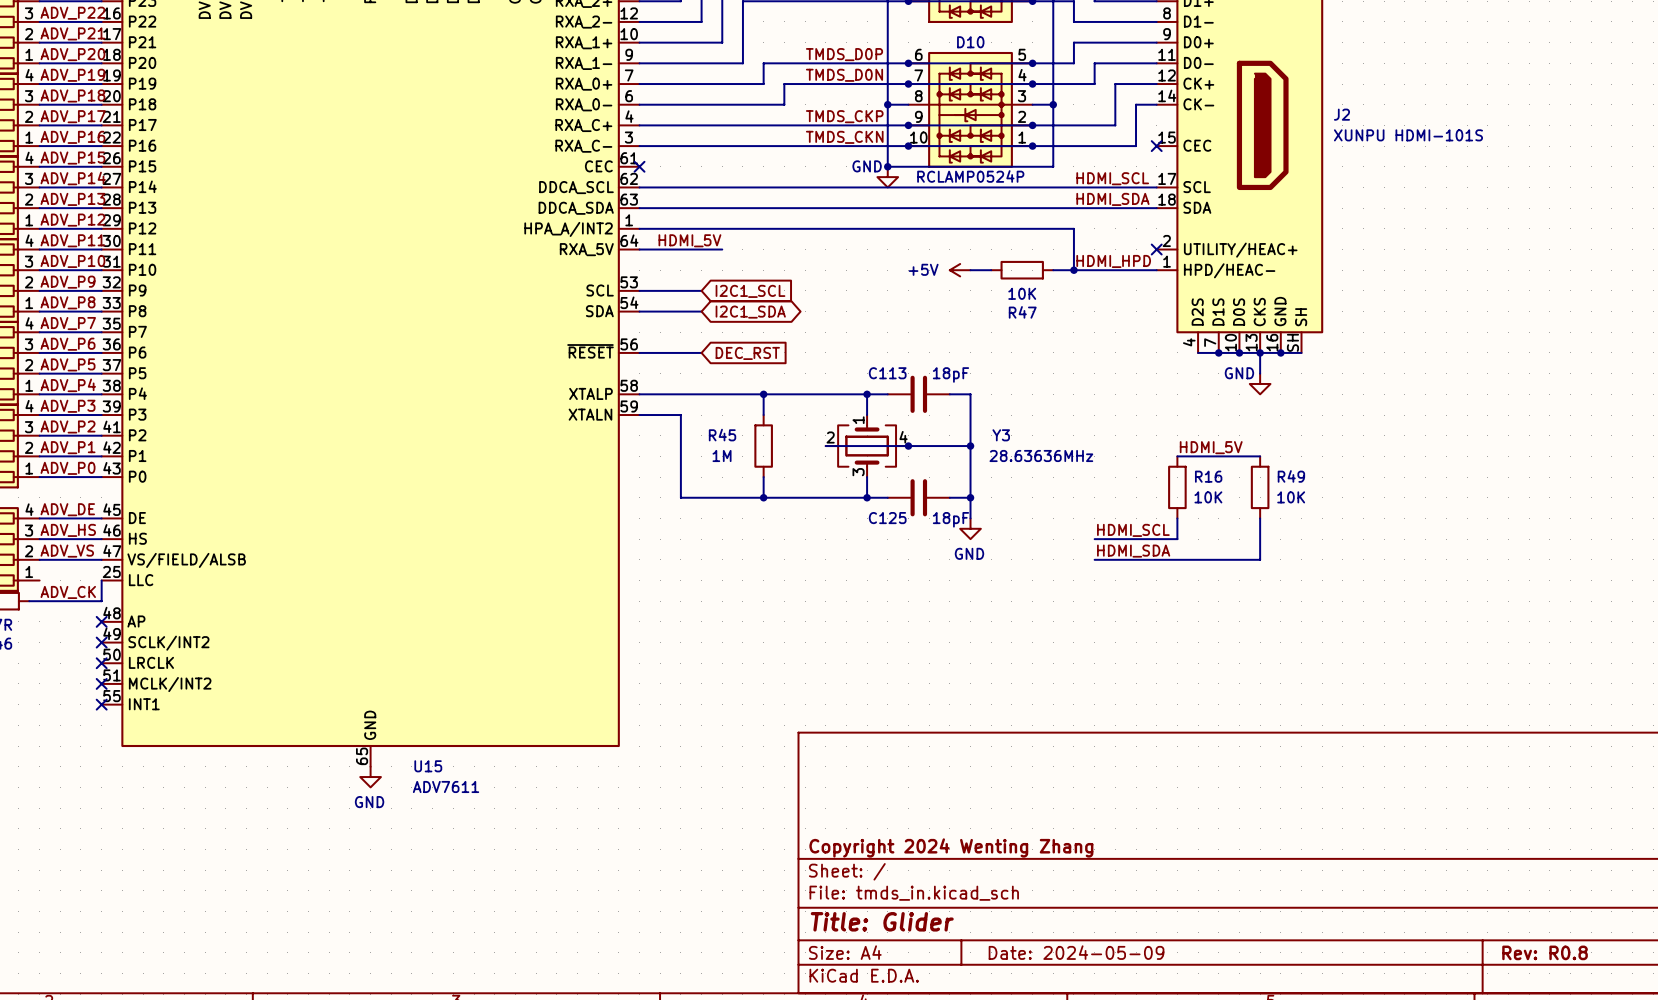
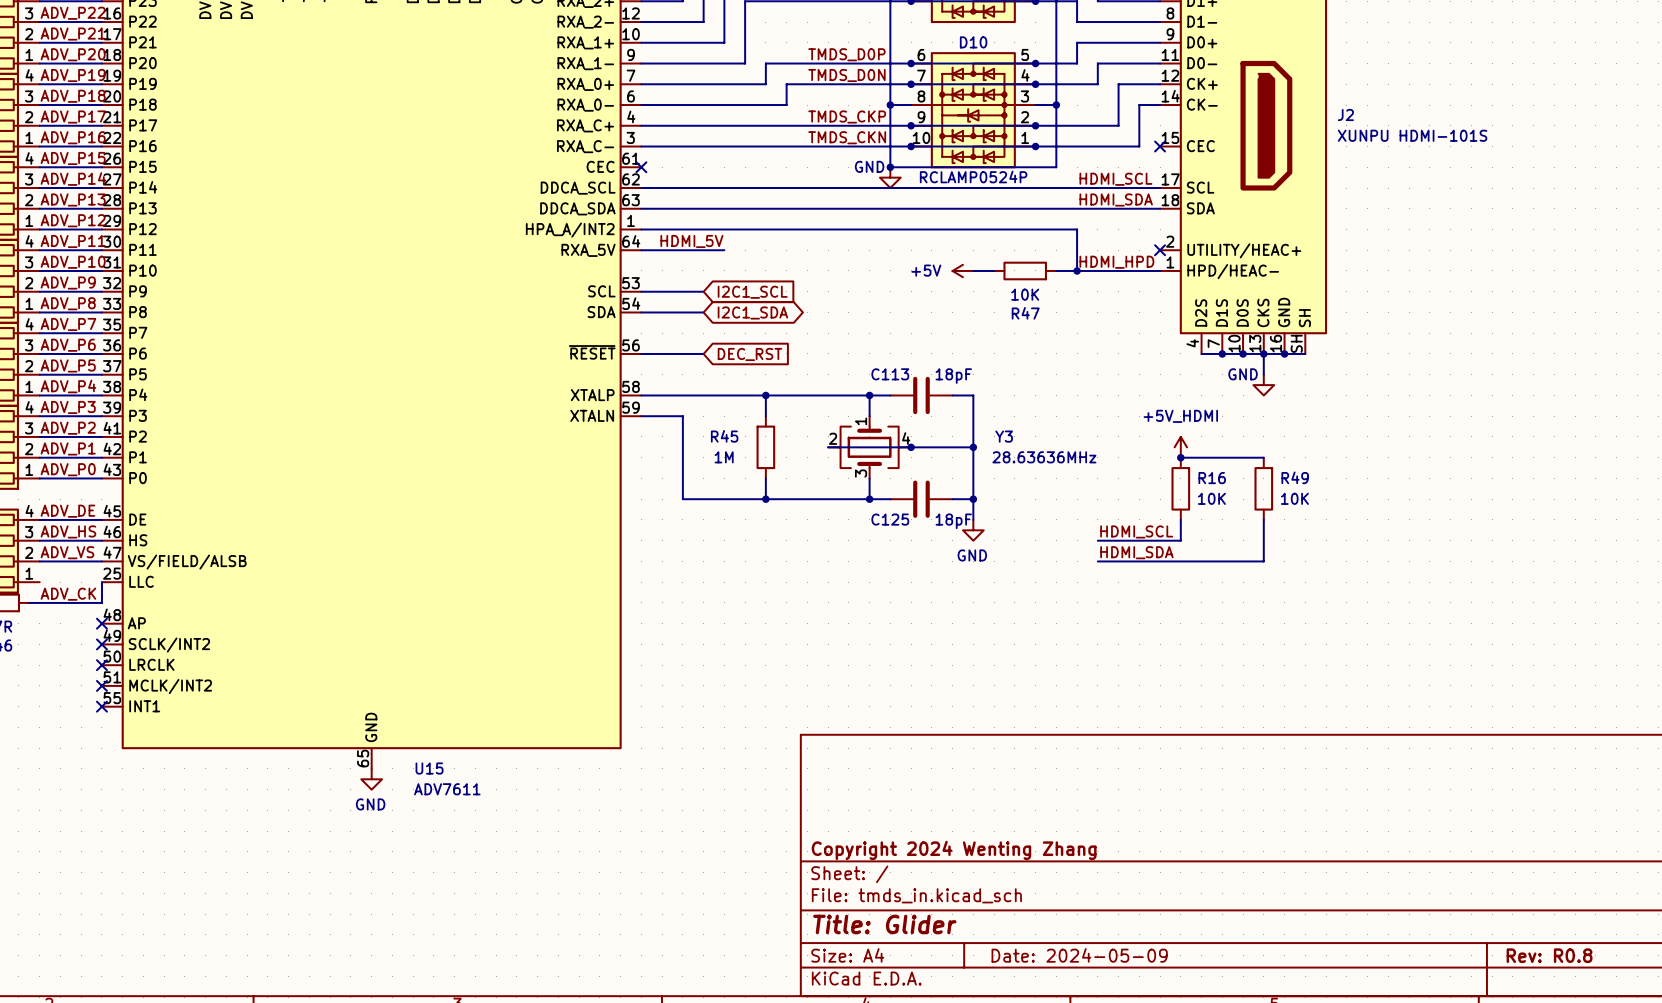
power symbol: none -> +5V_HDMI (1180, 447)
label: HDMI_5V (1211, 447) -> none
junction: none -> (1180, 457)

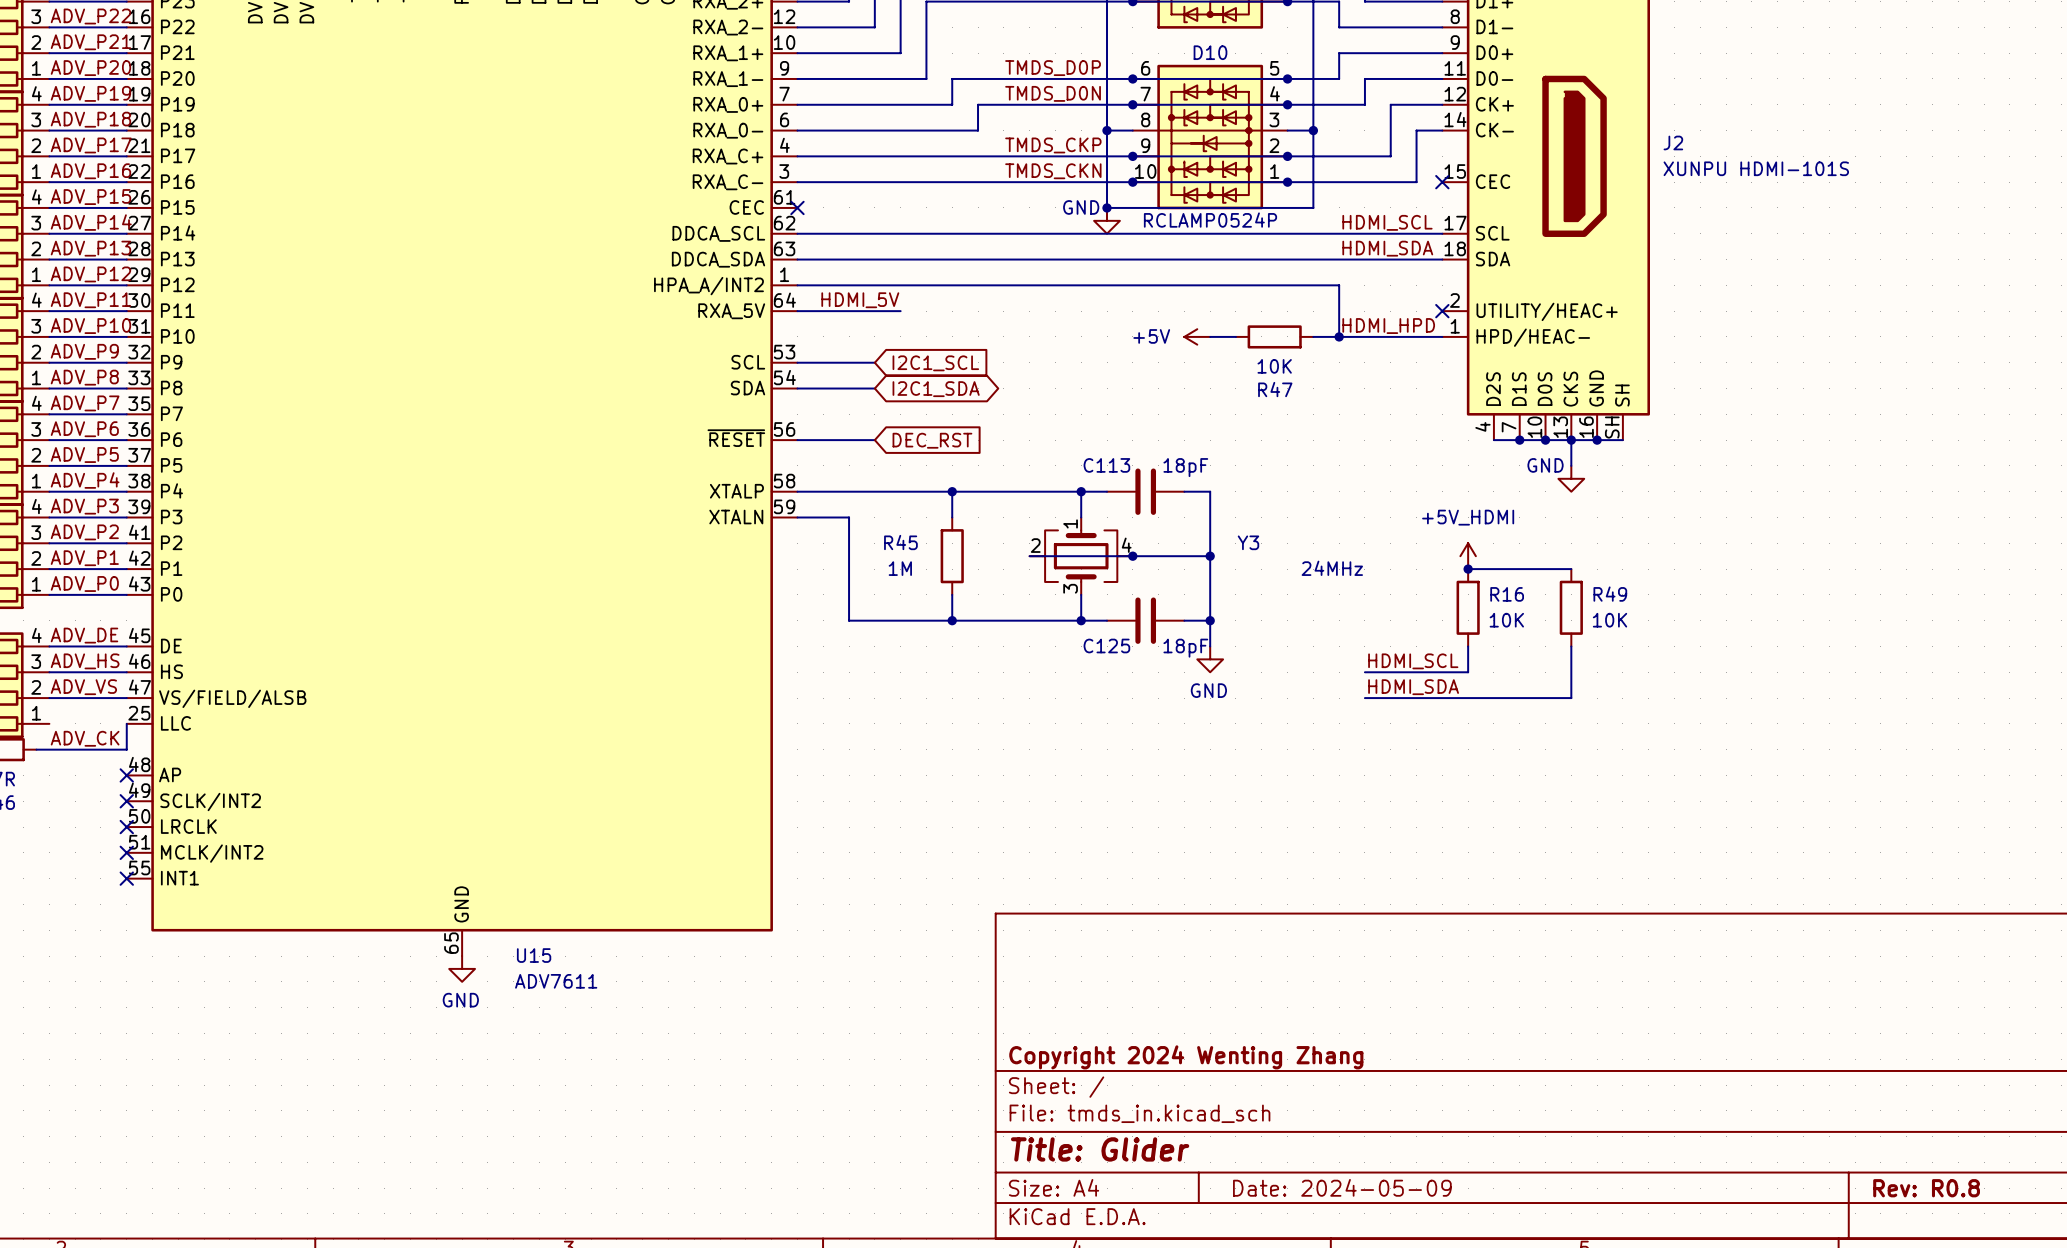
Y3 value: 28.63636MHz (1044, 457) -> 24MHz (1332, 568)

